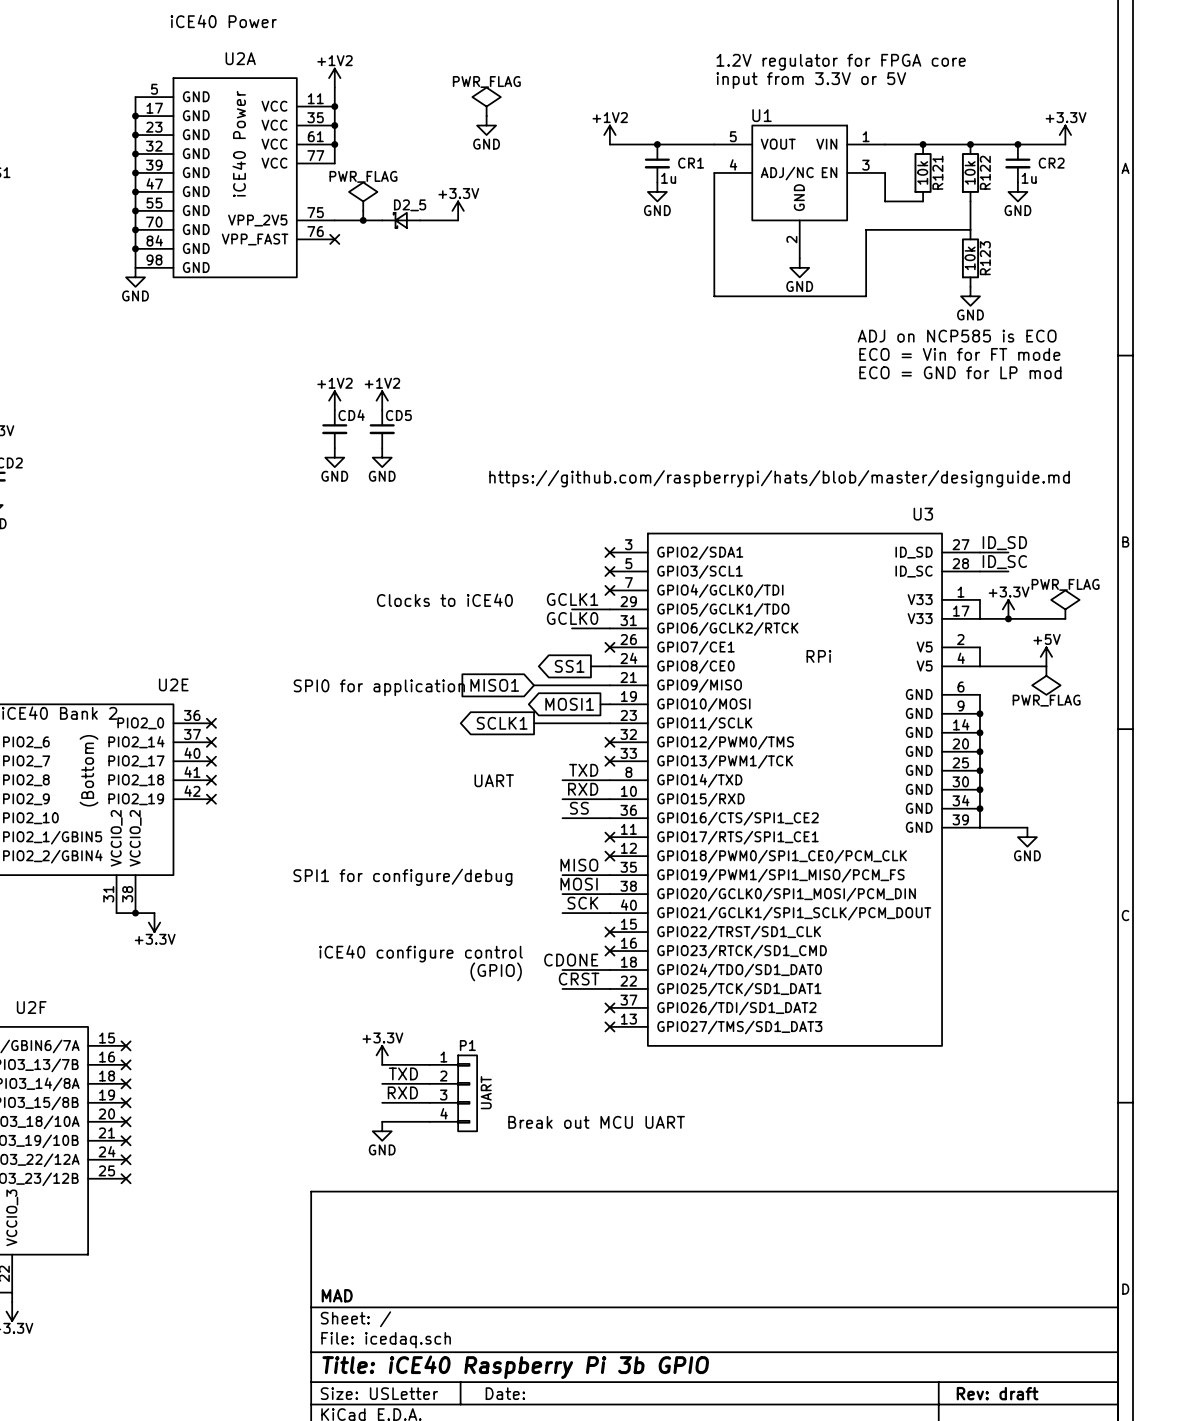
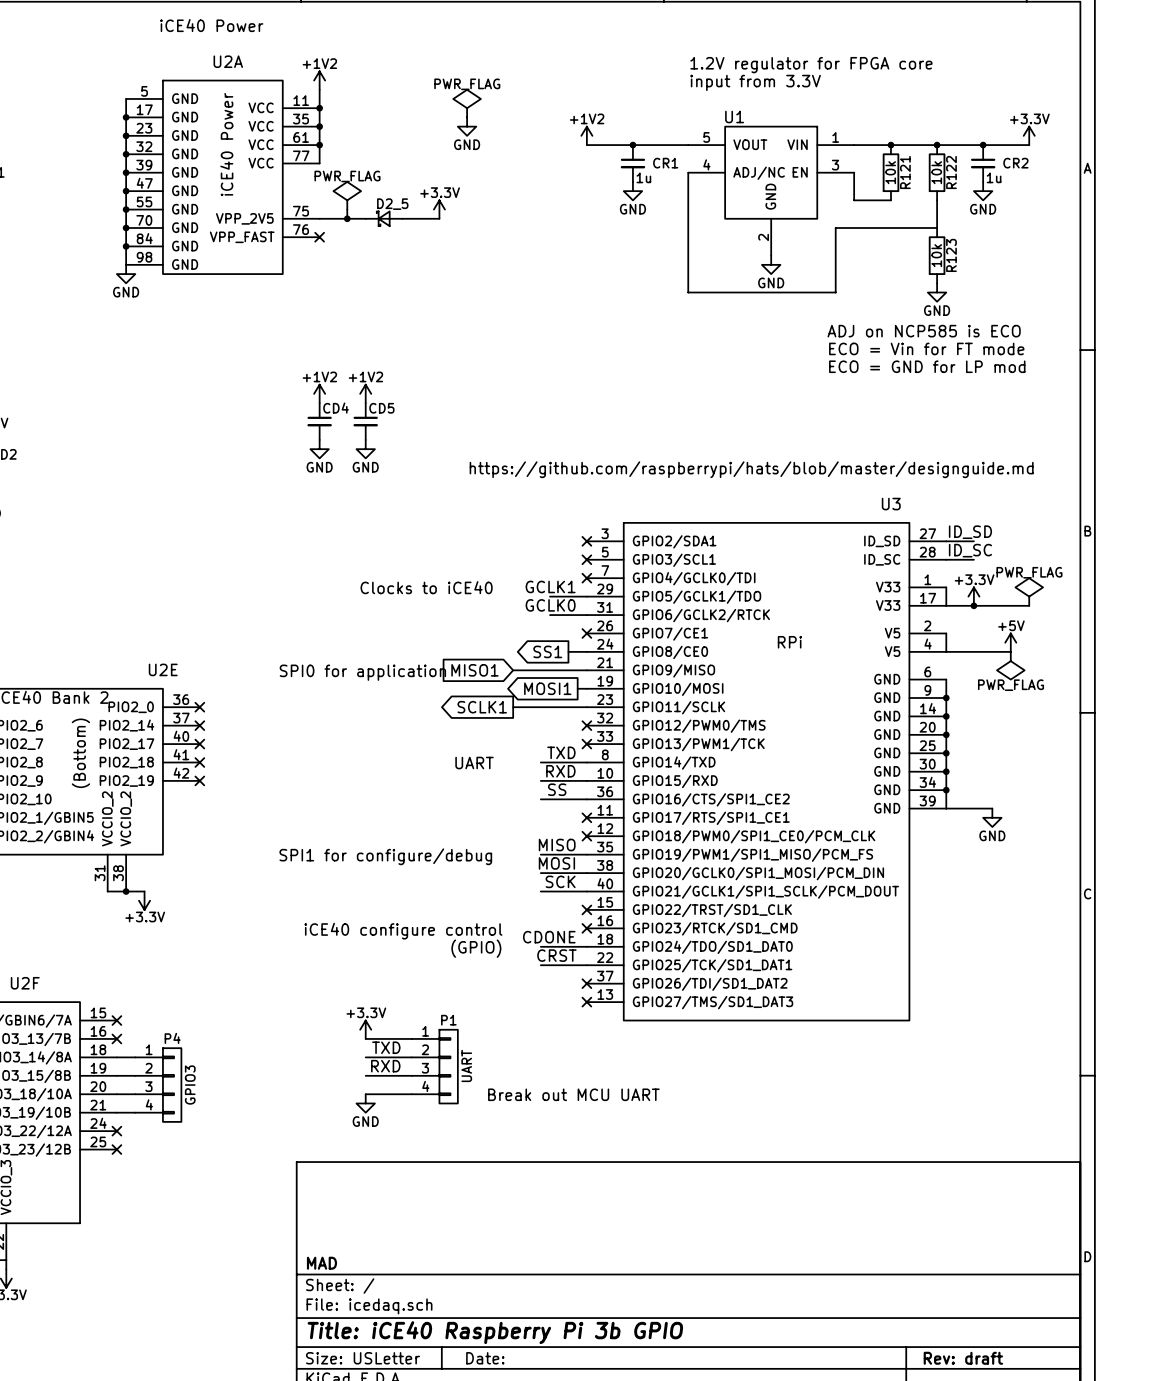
text: input from 3.3V or 5V (811, 80) -> input from 3.3V (755, 82)
wire: none -> (116, 1057) (135, 1057)
no-connect mark: (126, 1083) -> none
wire: none -> (116, 1075) (135, 1075)
no-connect mark: (126, 1102) -> none
P4: none -> GPIO3 (158, 1085)
wire: none -> (116, 1094) (135, 1094)
no-connect mark: (126, 1121) -> none
wire: none -> (116, 1112) (135, 1112)
no-connect mark: (126, 1140) -> none

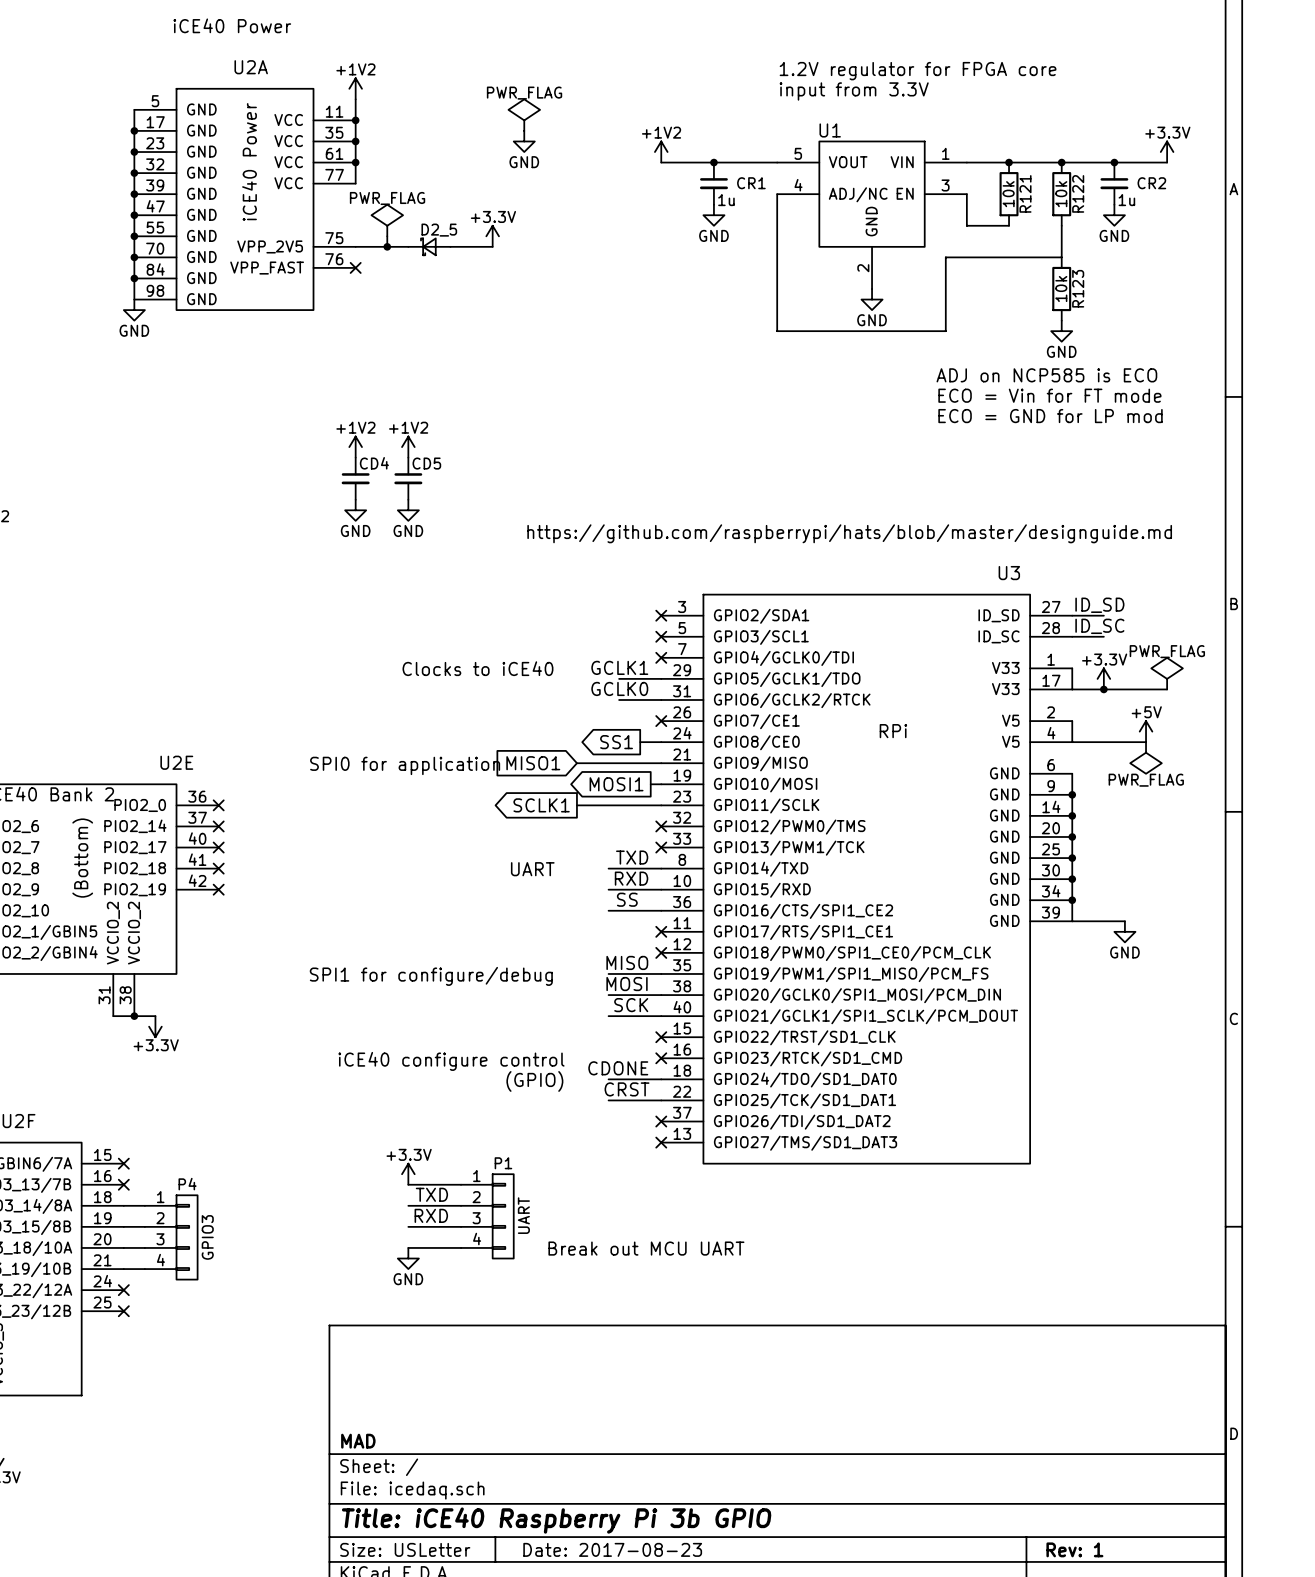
title block: Date: (485, 1358) -> Date: 2017-08-23 (612, 1549)
title block: Rev: draft (963, 1358) -> Rev: 1 (1074, 1549)

